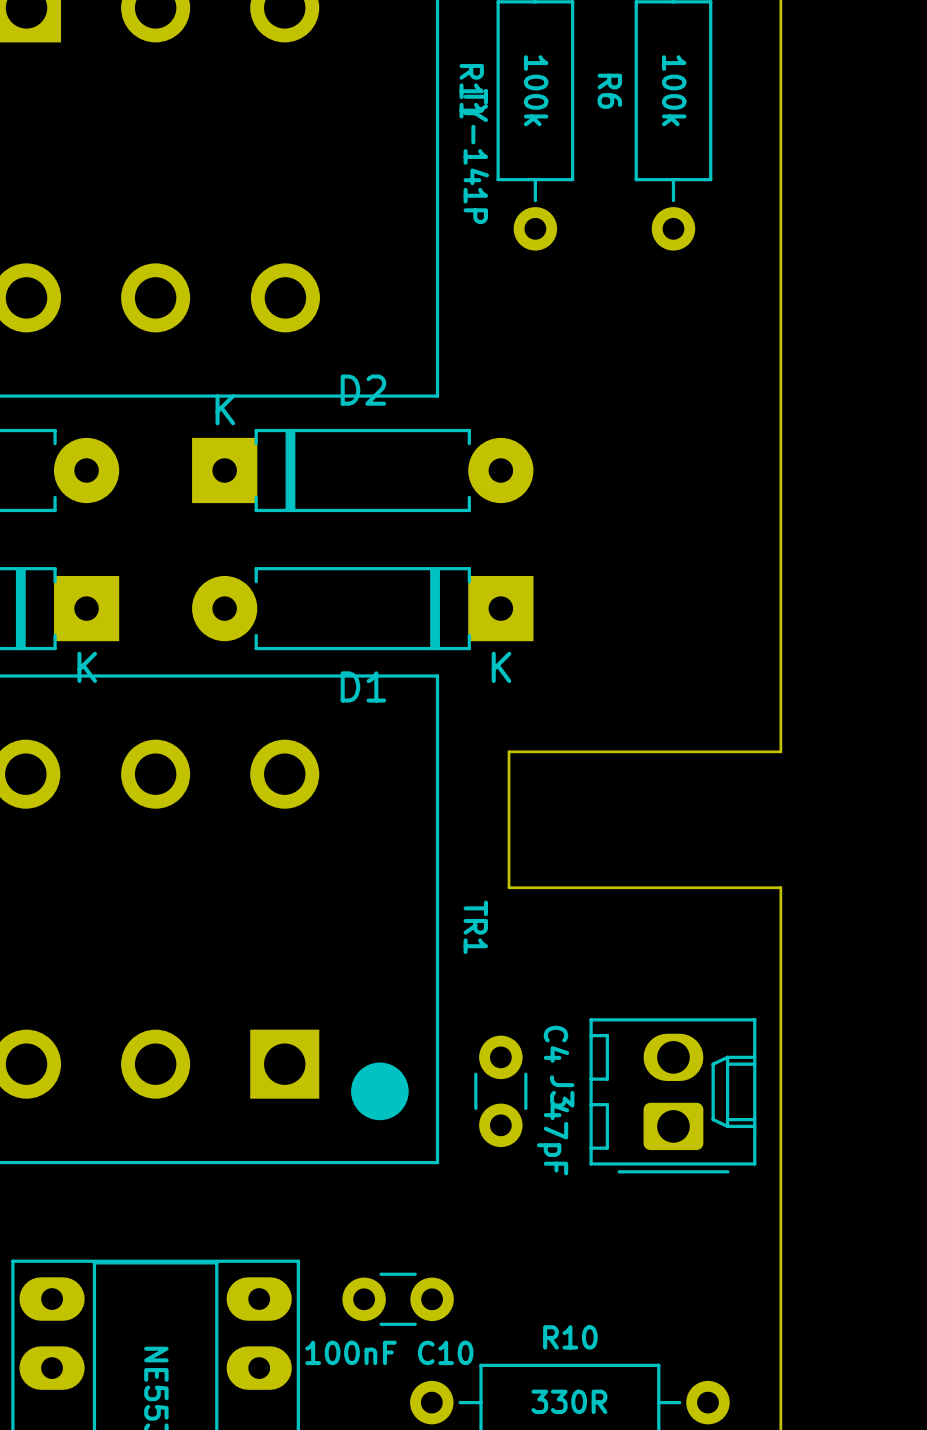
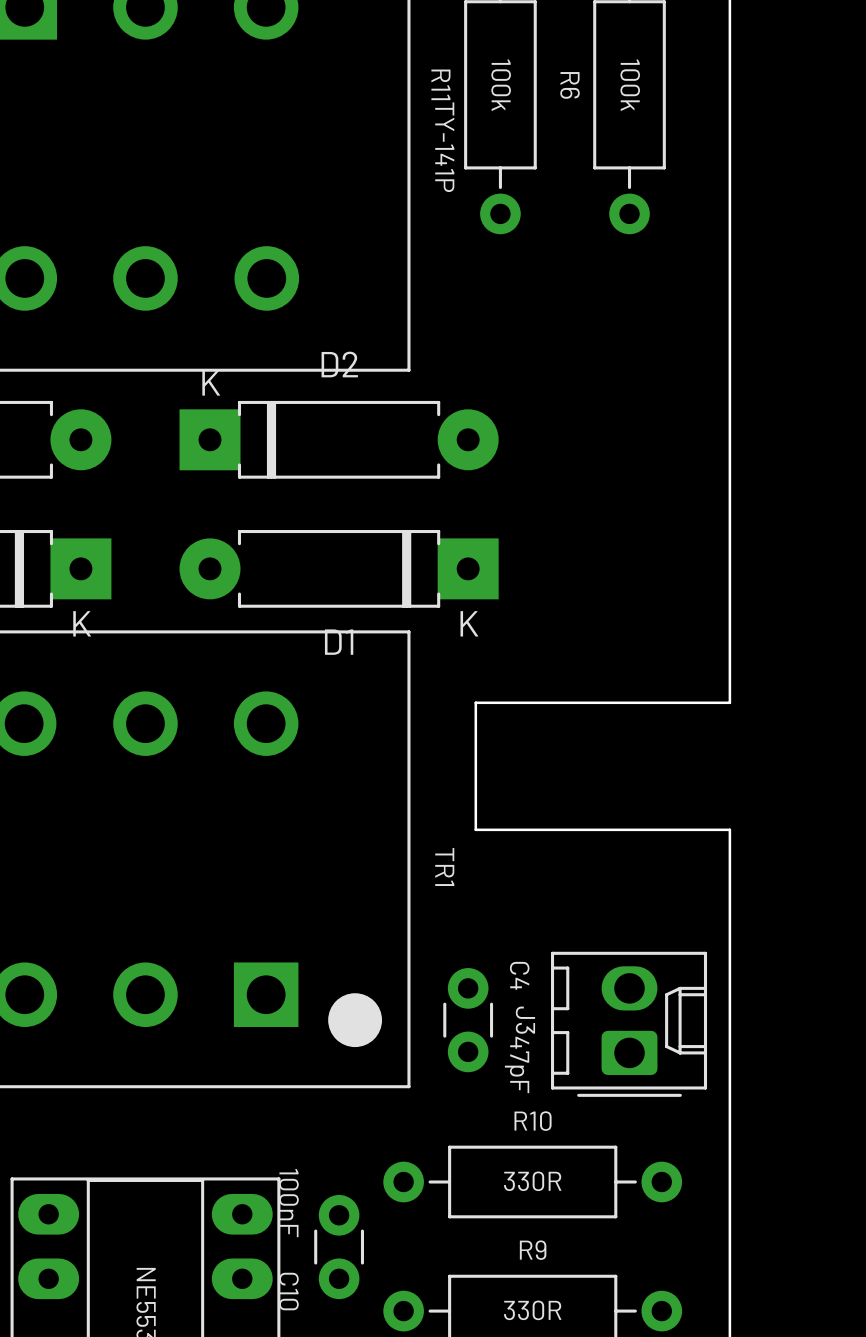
R10: none -> 330R (532, 1182)
C10 rotation: 0° (398, 1299) -> 90° clockwise (339, 1247)
R10 name: R10 (570, 1337) -> R9 (533, 1250)

